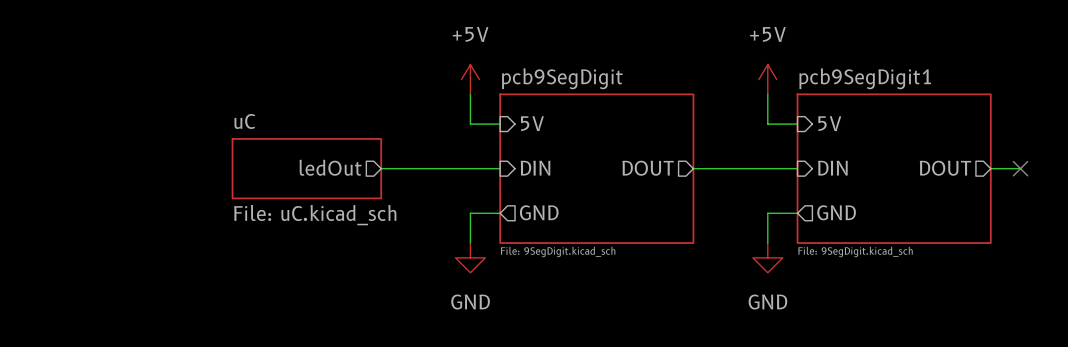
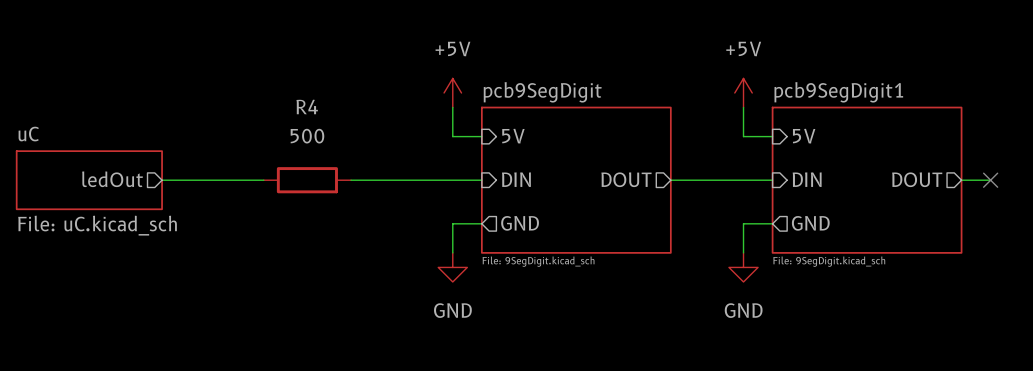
sheet pin position: ledOut (330, 167) -> ledOut (112, 179)
wire: none -> (162, 180) (263, 180)
sheet uC position: (306, 168) -> (89, 180)
R4: none -> 500 (307, 180)
wire: none -> (351, 180) (365, 180)

